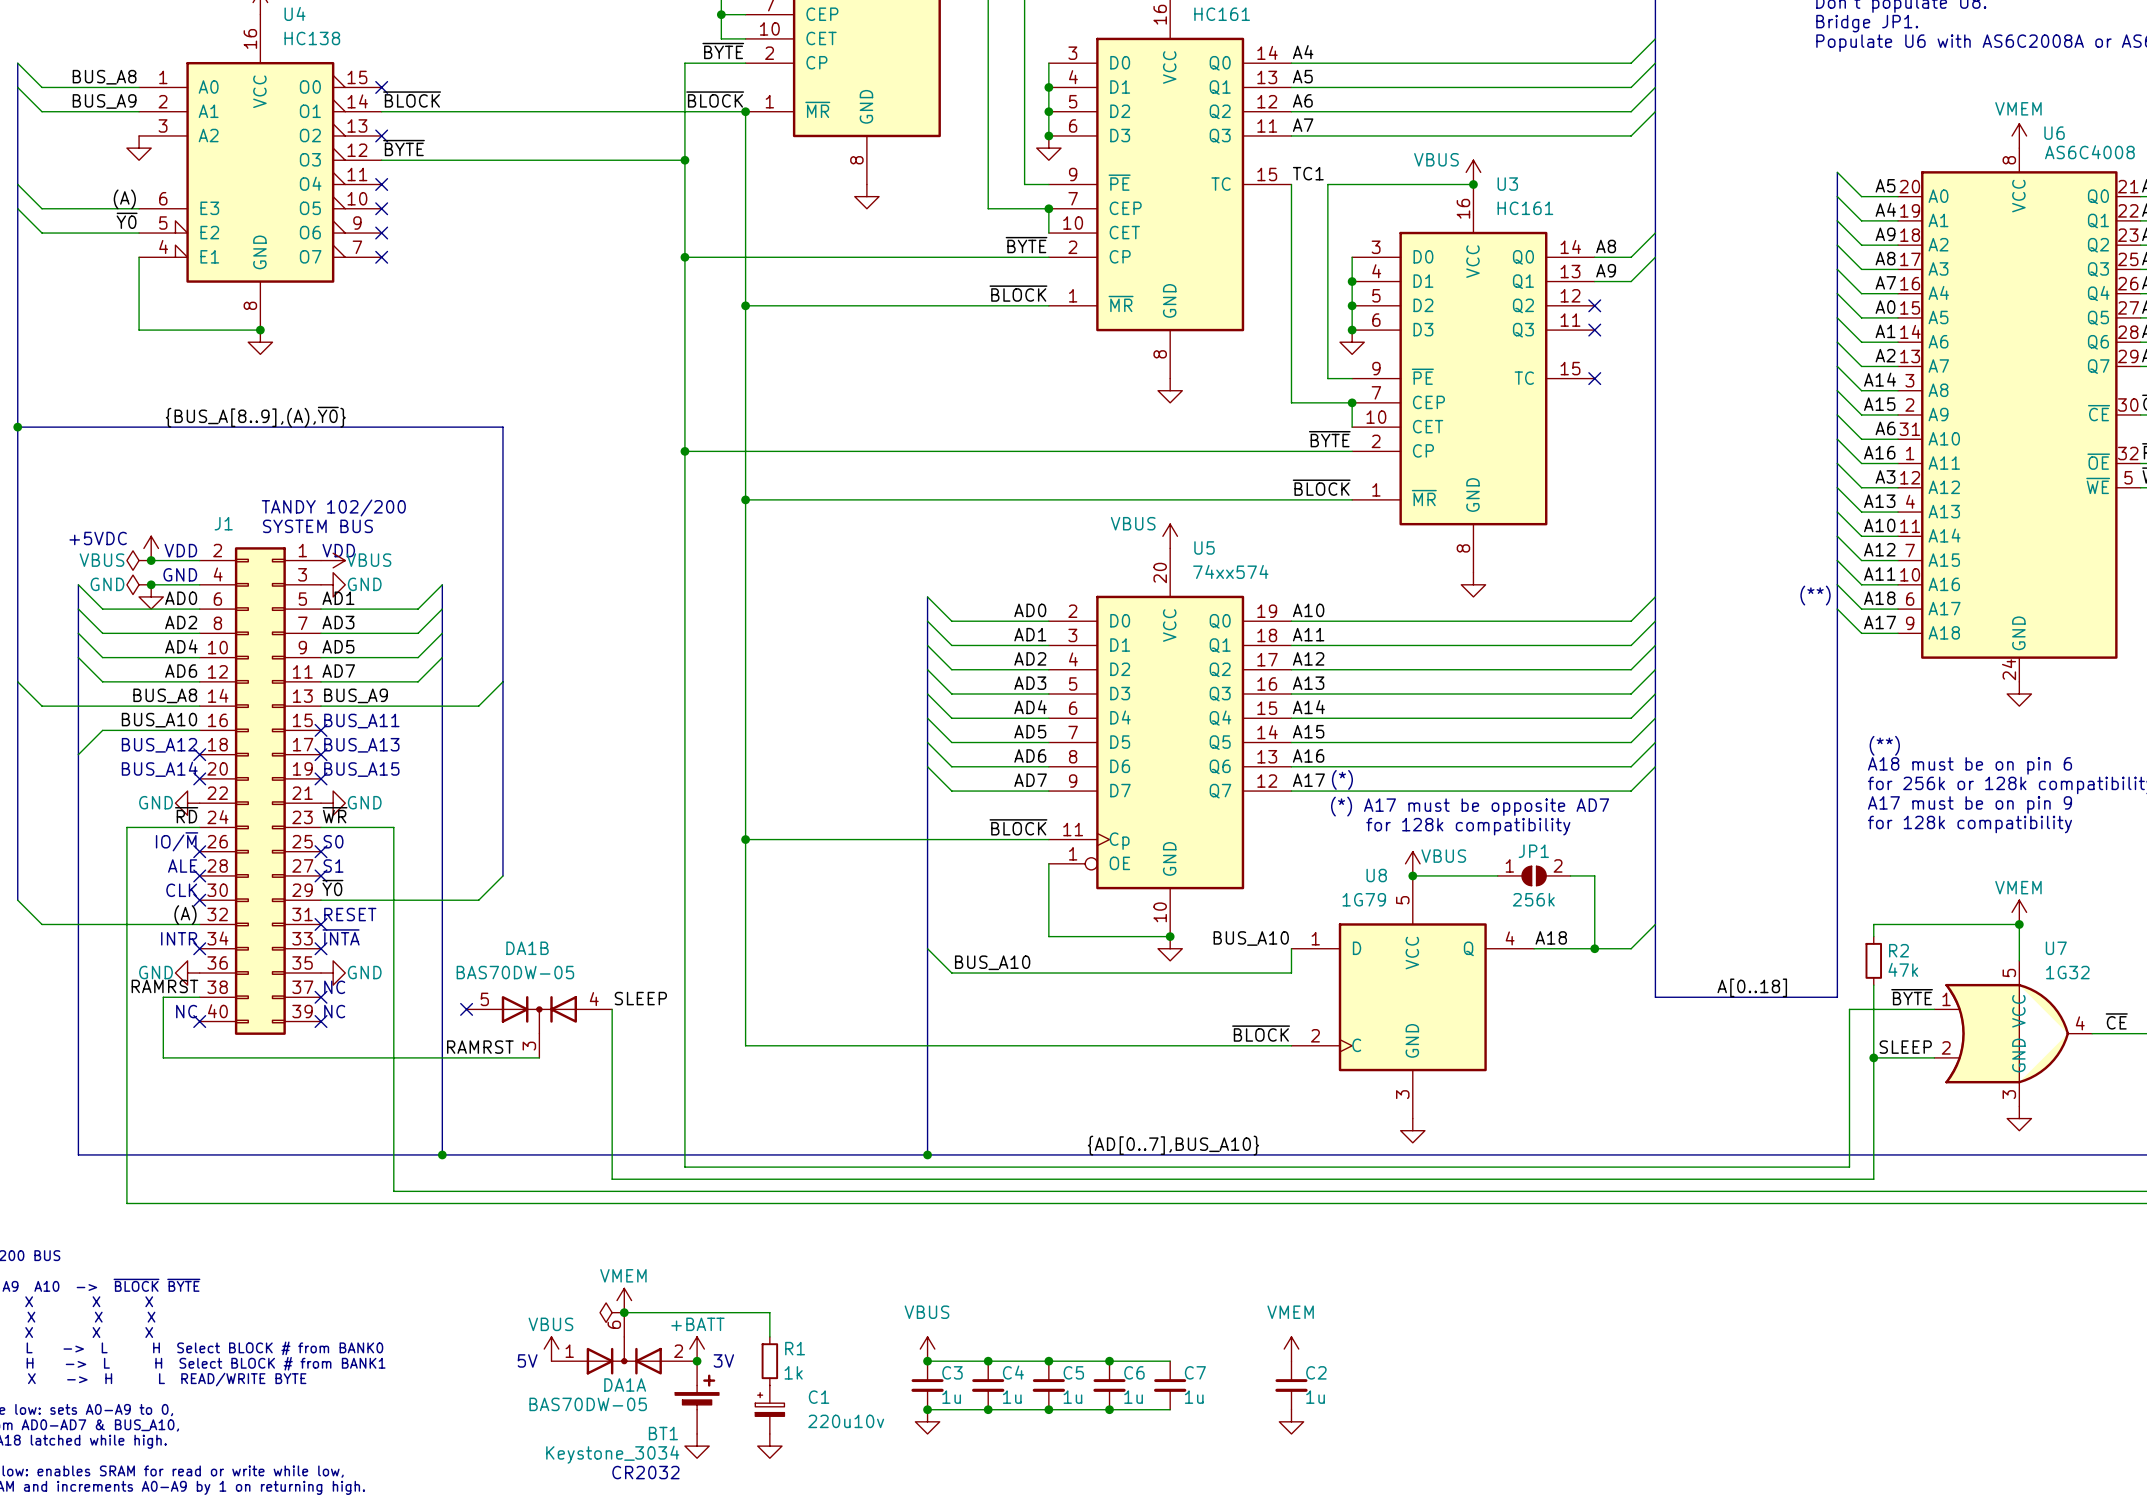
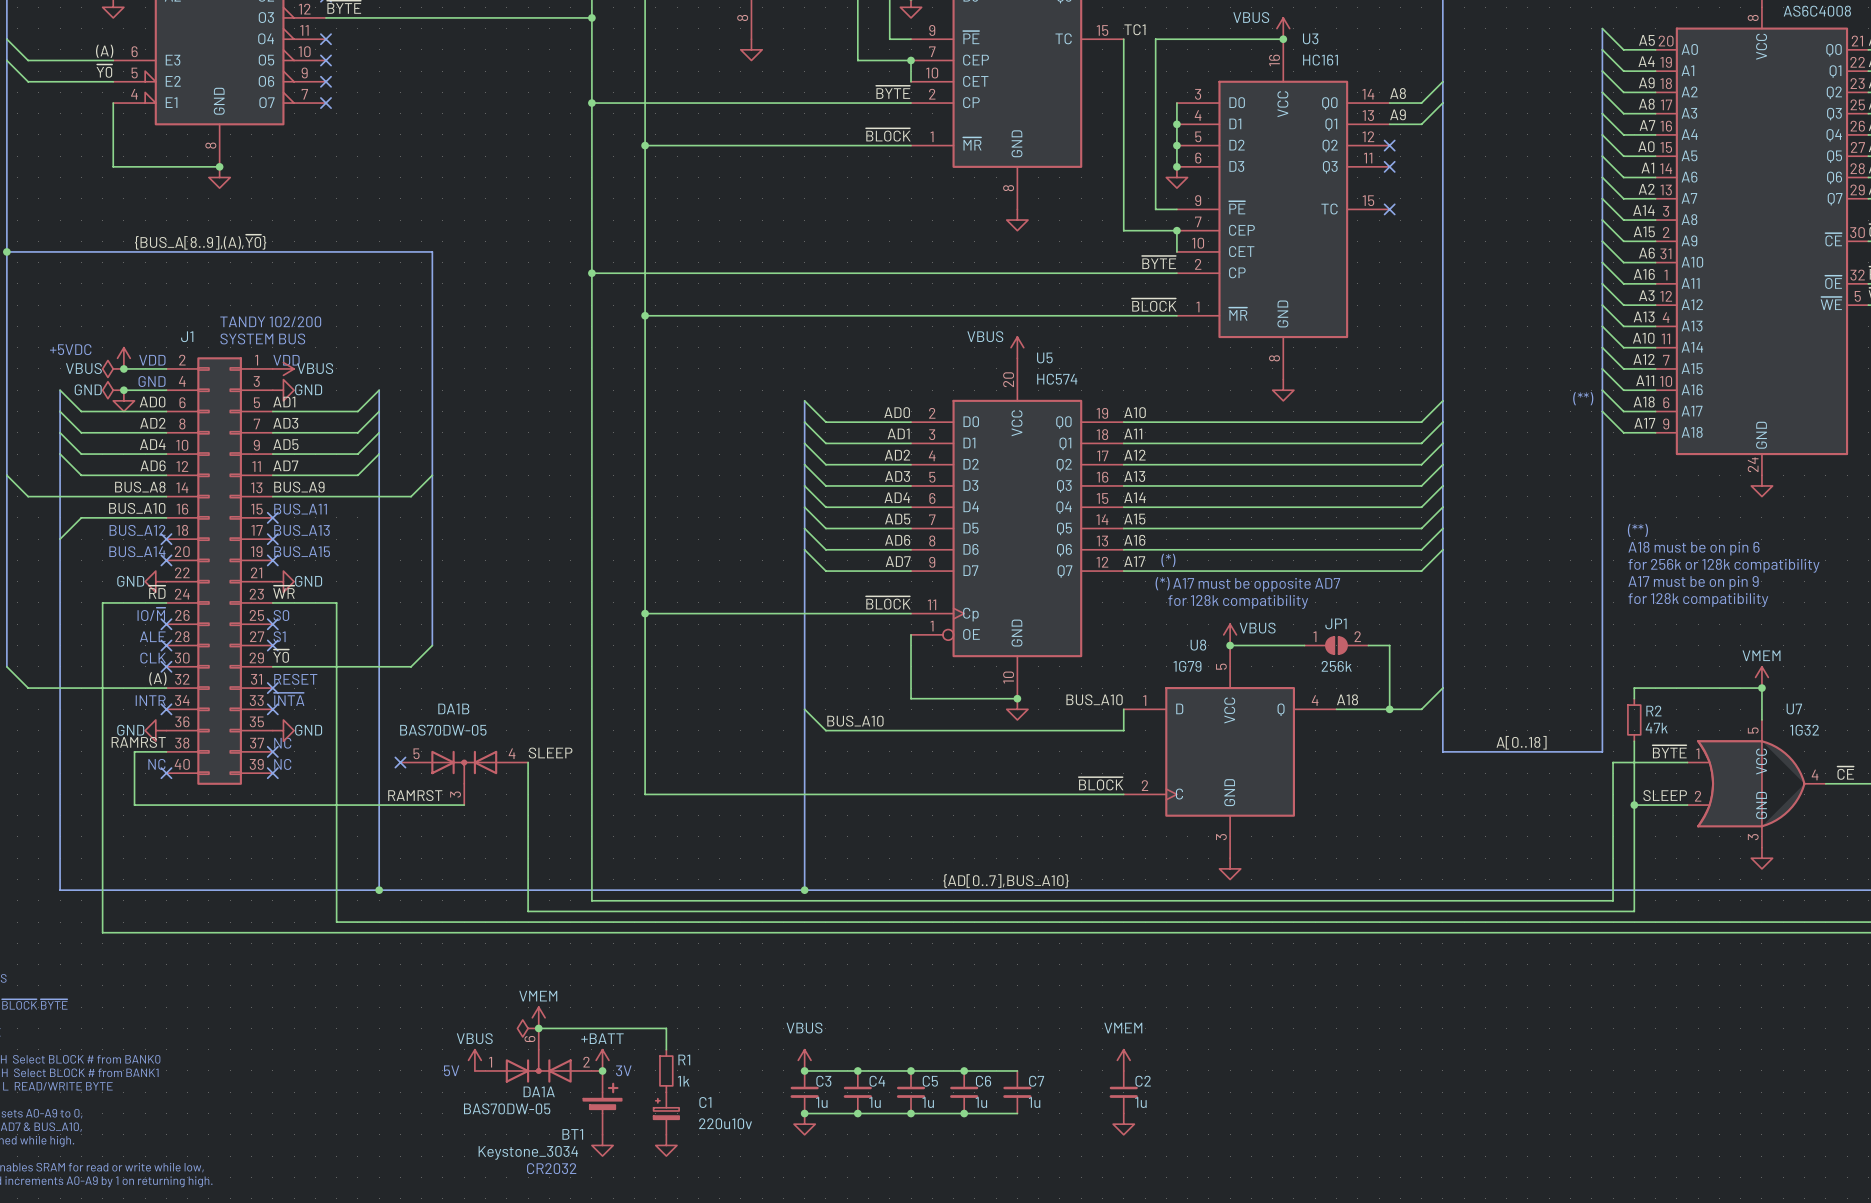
U5 value: 74xx574 (1230, 571) -> HC574 (1057, 379)

